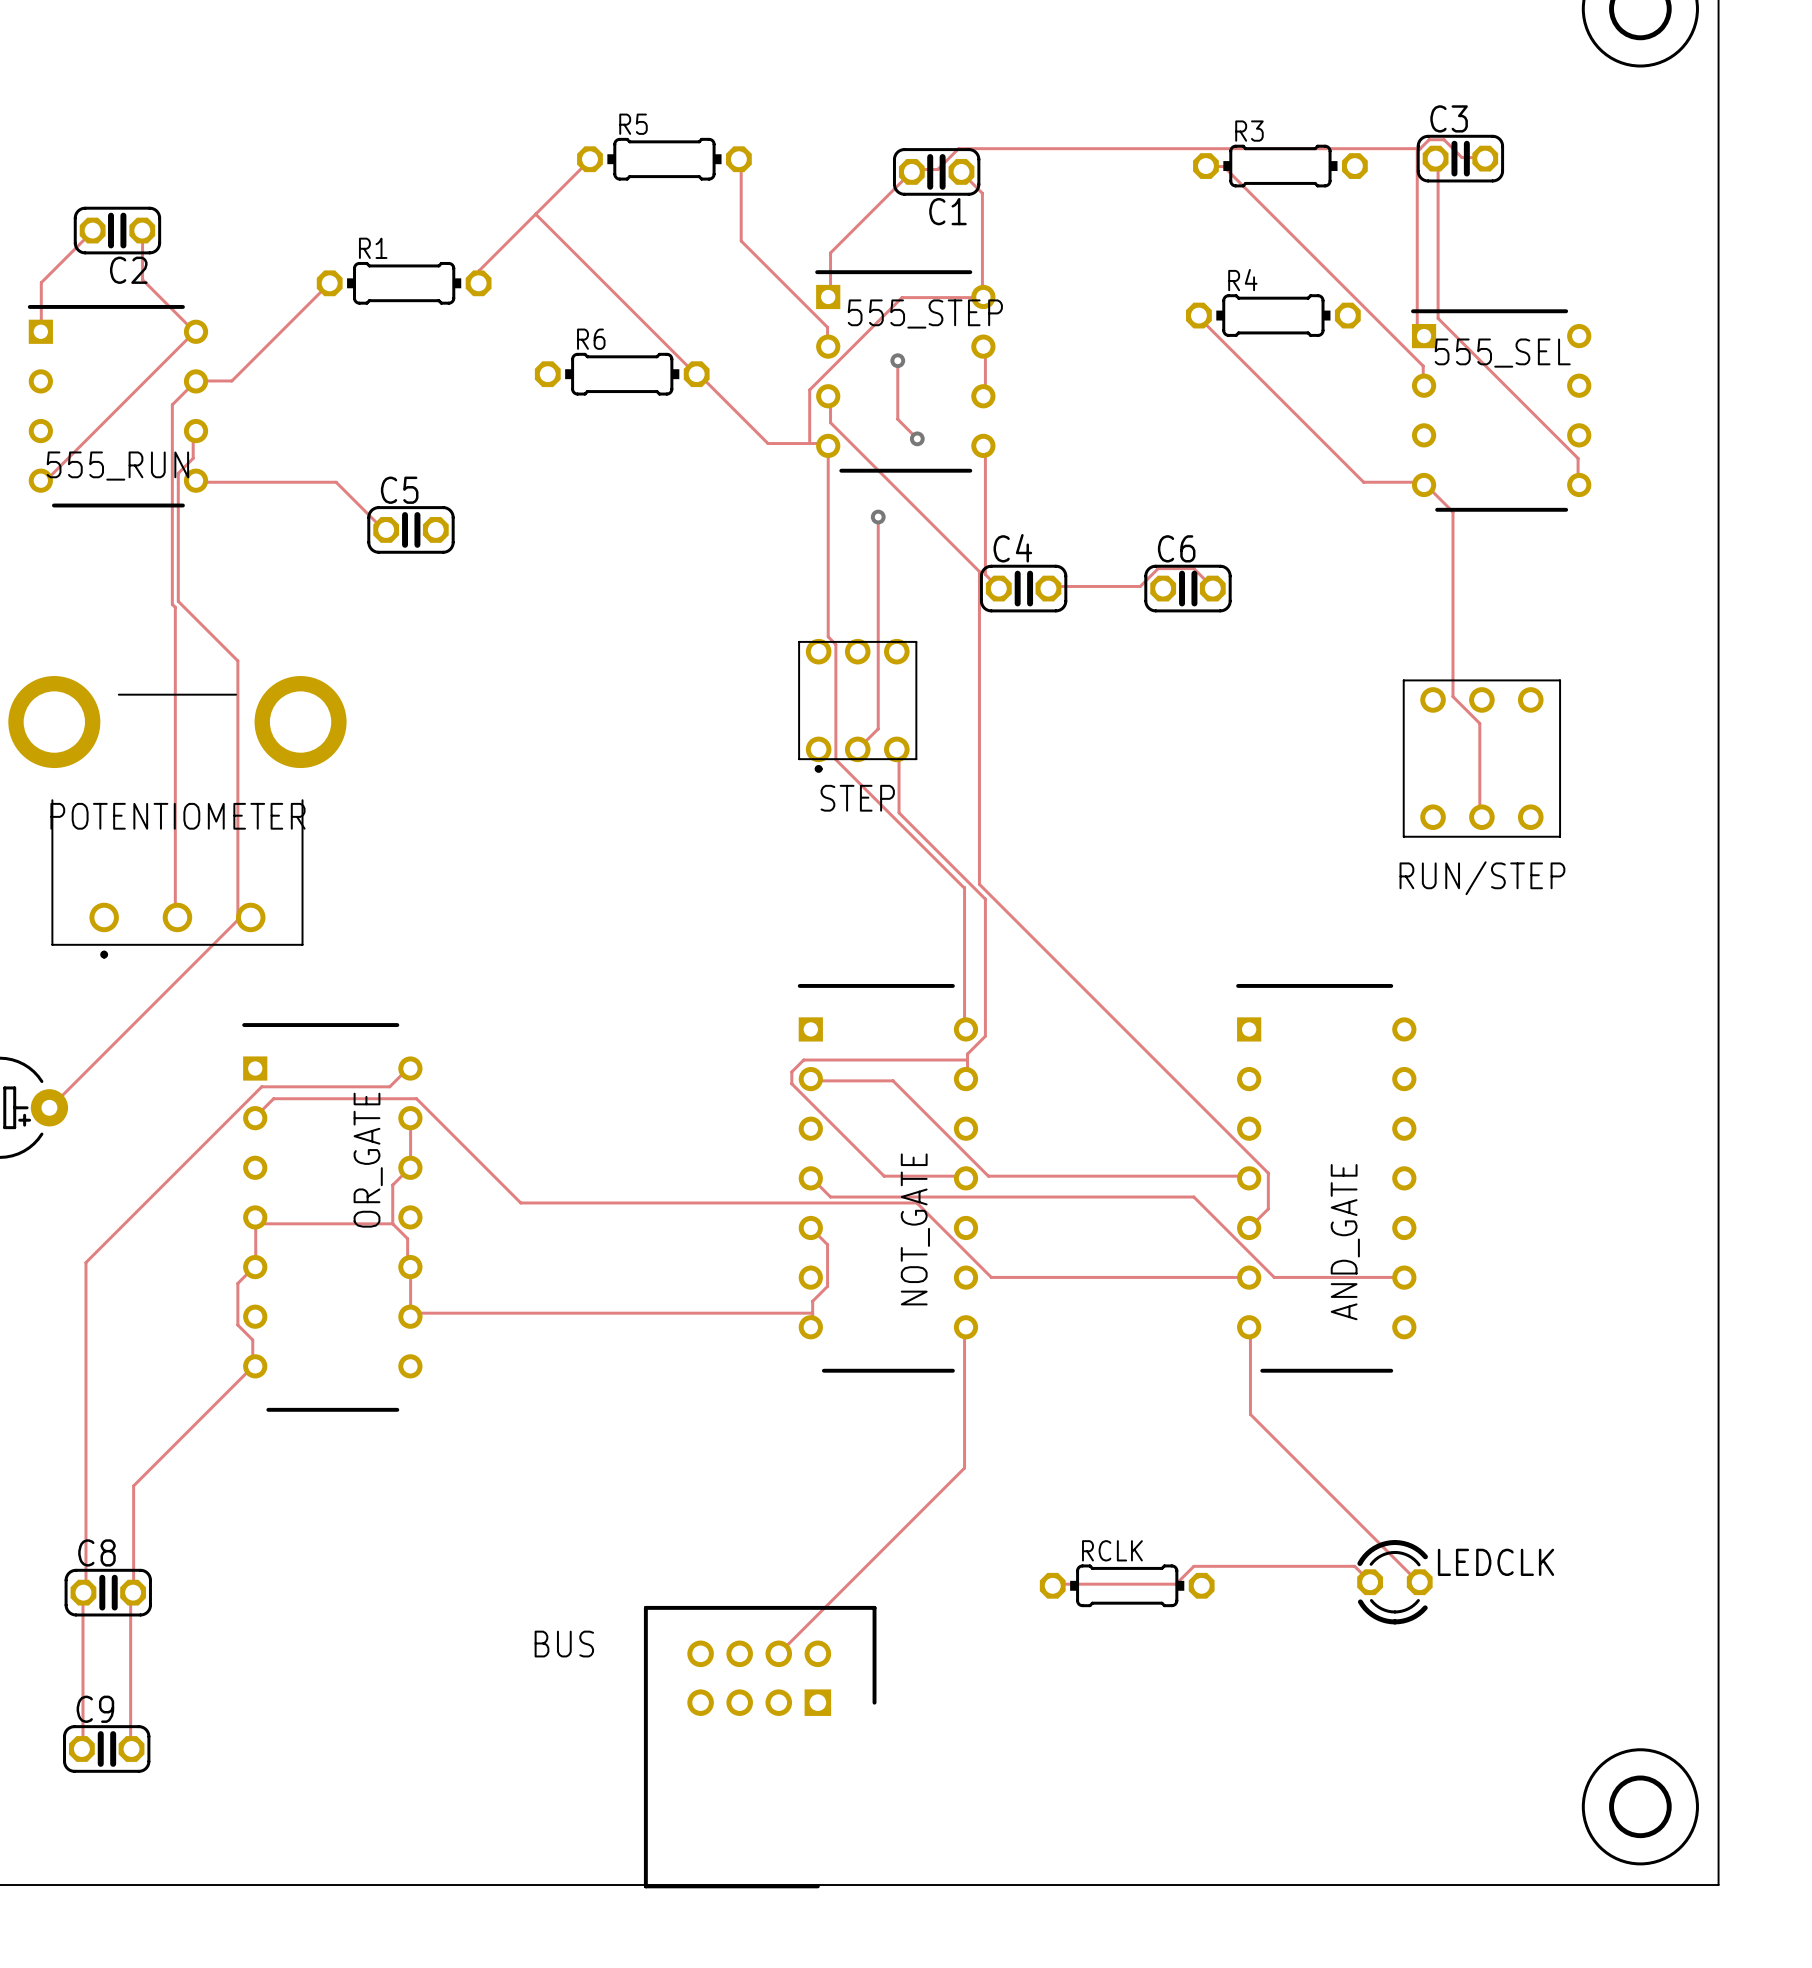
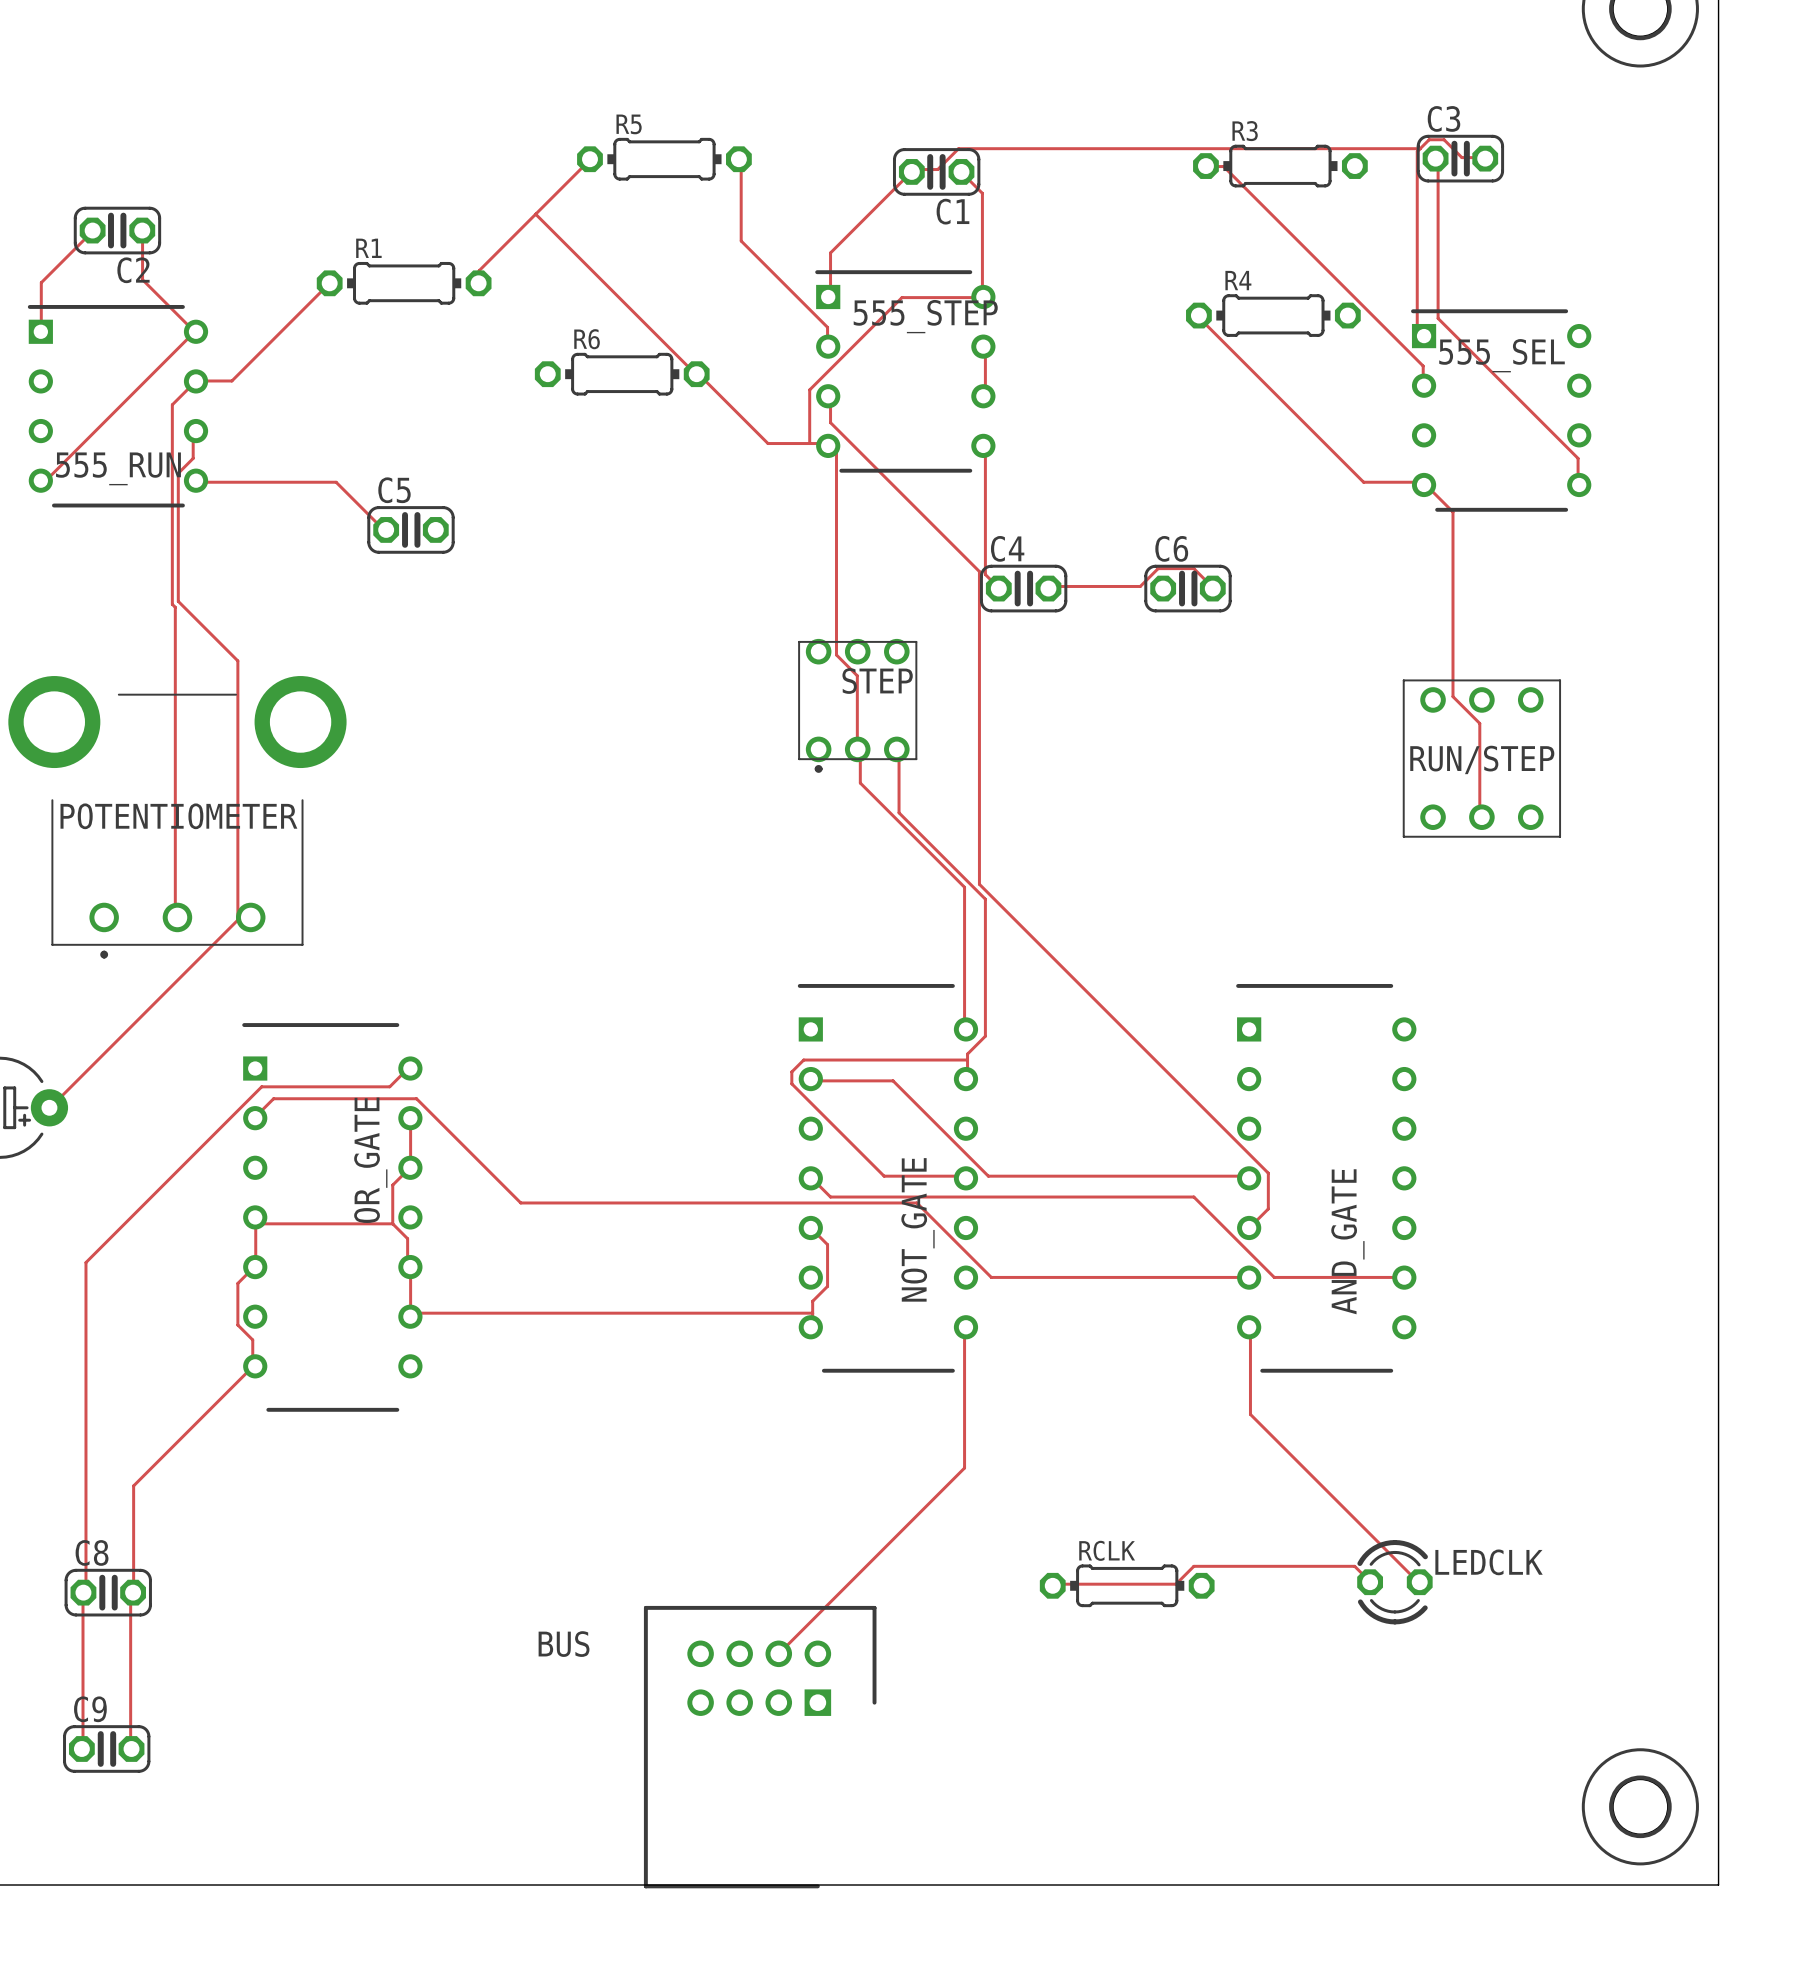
track: (897, 360) (897, 419) (917, 438) -> none
via: (897, 360) -> none
via: (917, 438) -> none
track: (828, 445) (828, 636) (835, 644) (835, 759) (964, 888) -> none
track: none -> (836, 452) (836, 654) (857, 675) (857, 747) (860, 750) (860, 783) (964, 887)
track: (878, 517) (878, 728) (857, 749) -> none
via: (878, 517) -> none
STEP name position: STEP (857, 798) -> STEP (877, 681)
RUN/STEP name position: RUN/STEP (1482, 878) -> RUN/STEP (1482, 759)

